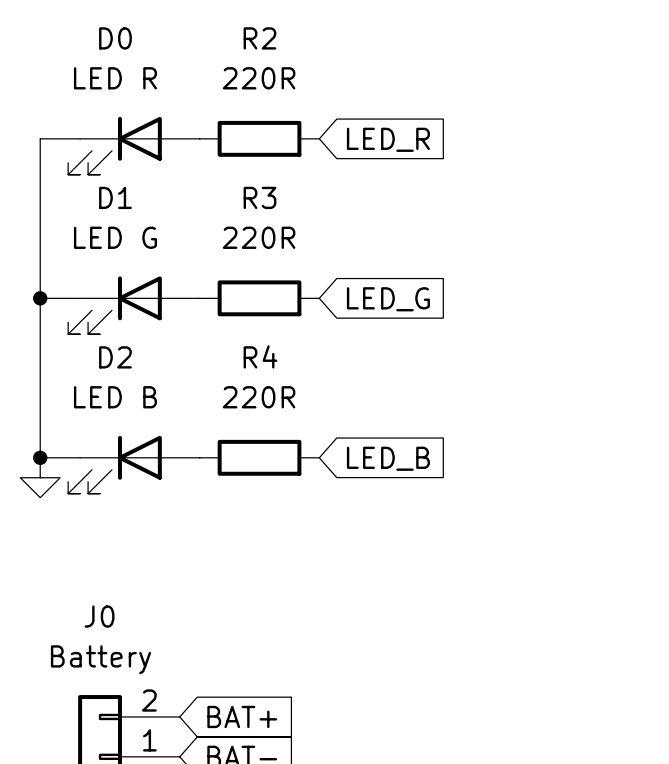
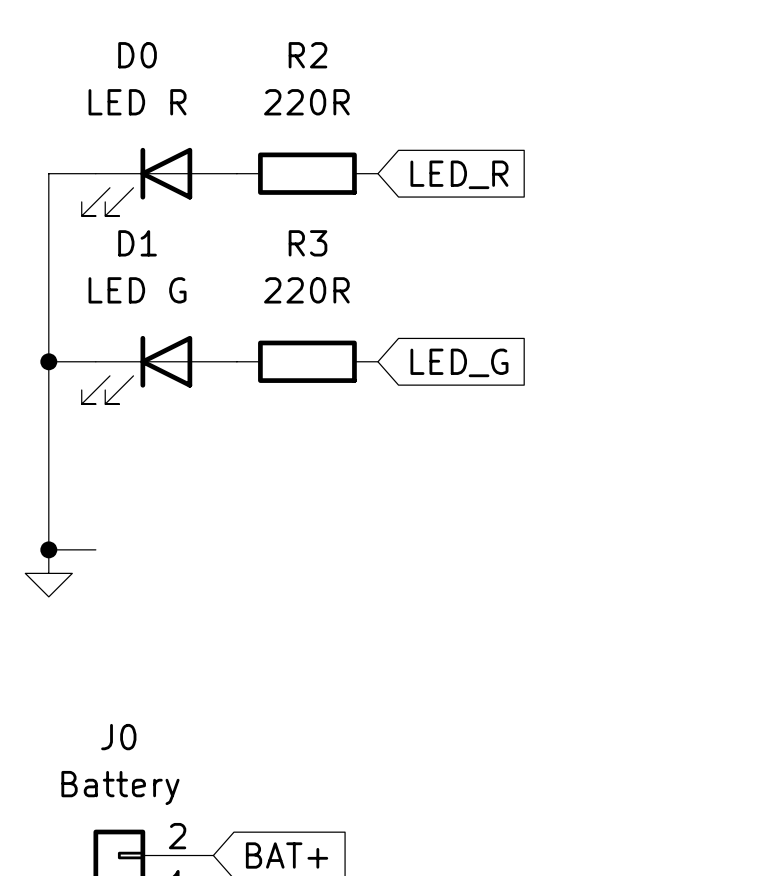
R4: 220R (259, 457) -> none
global label: LED_B (388, 458) -> none
D2: LED B (133, 464) -> none

